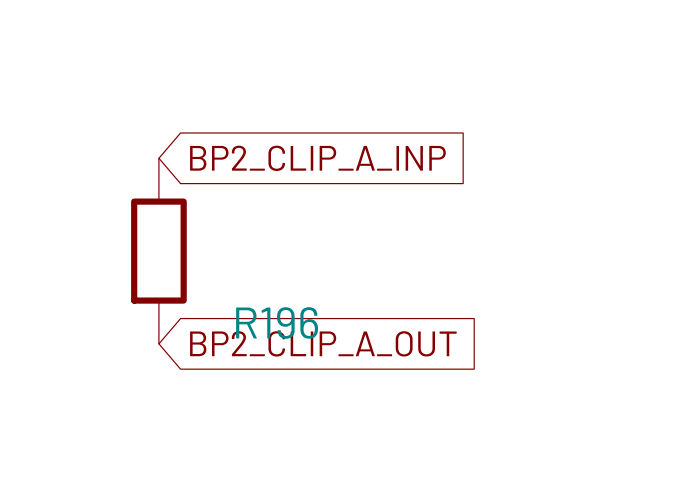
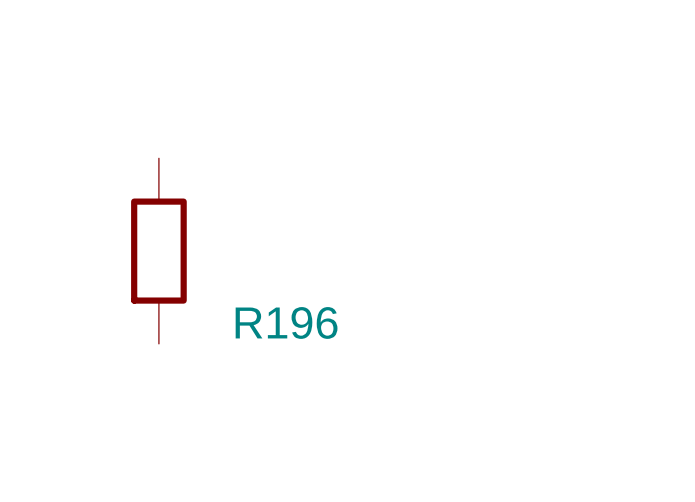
global label: BP2_CLIP_A_INP (317, 158) -> none
global label: BP2_CLIP_A_OUT (323, 343) -> none

